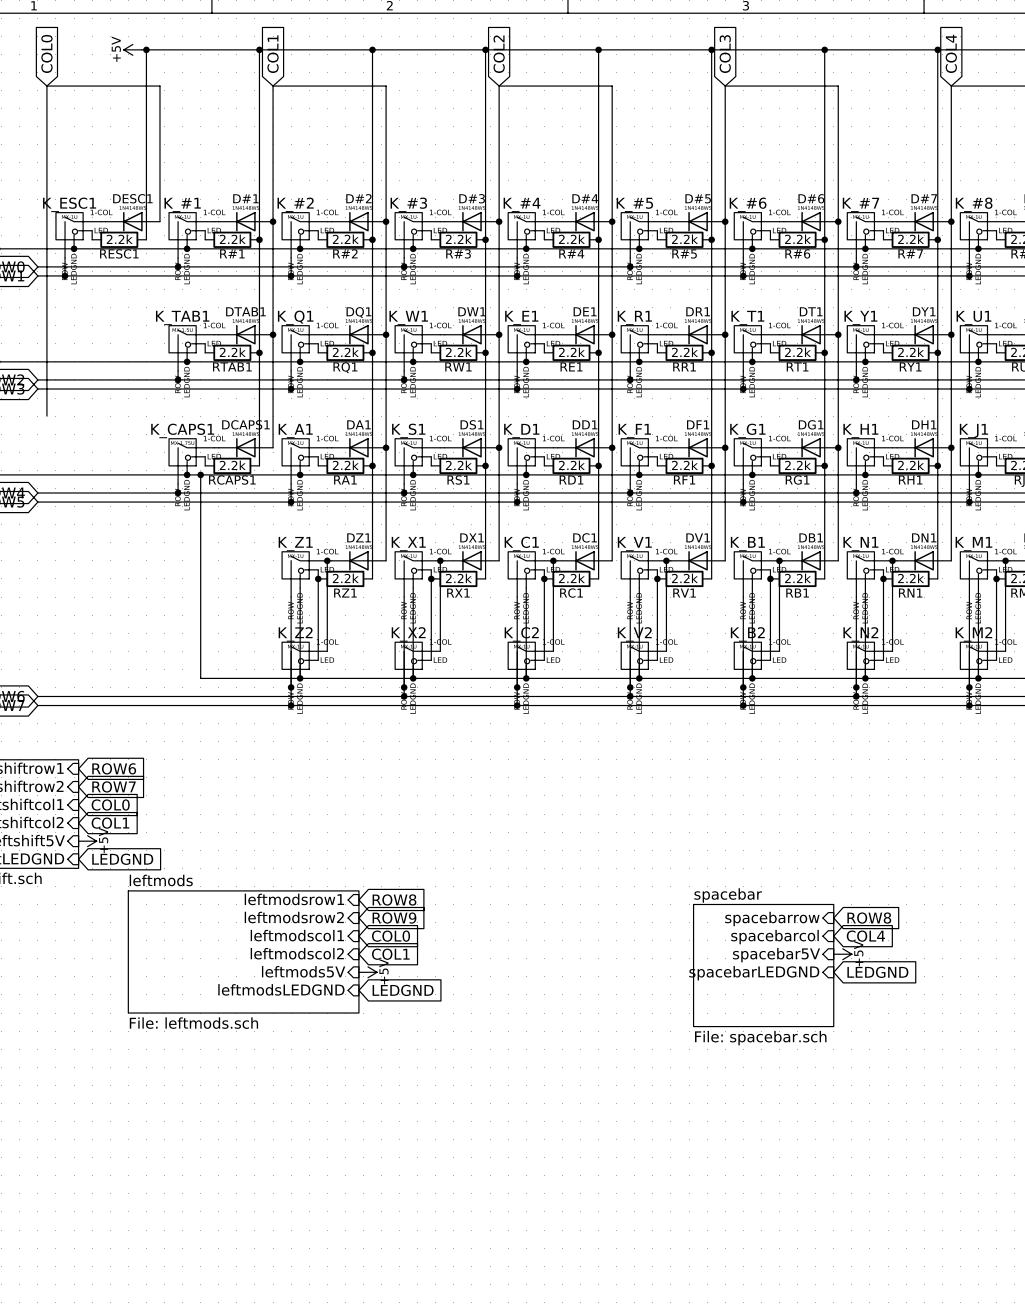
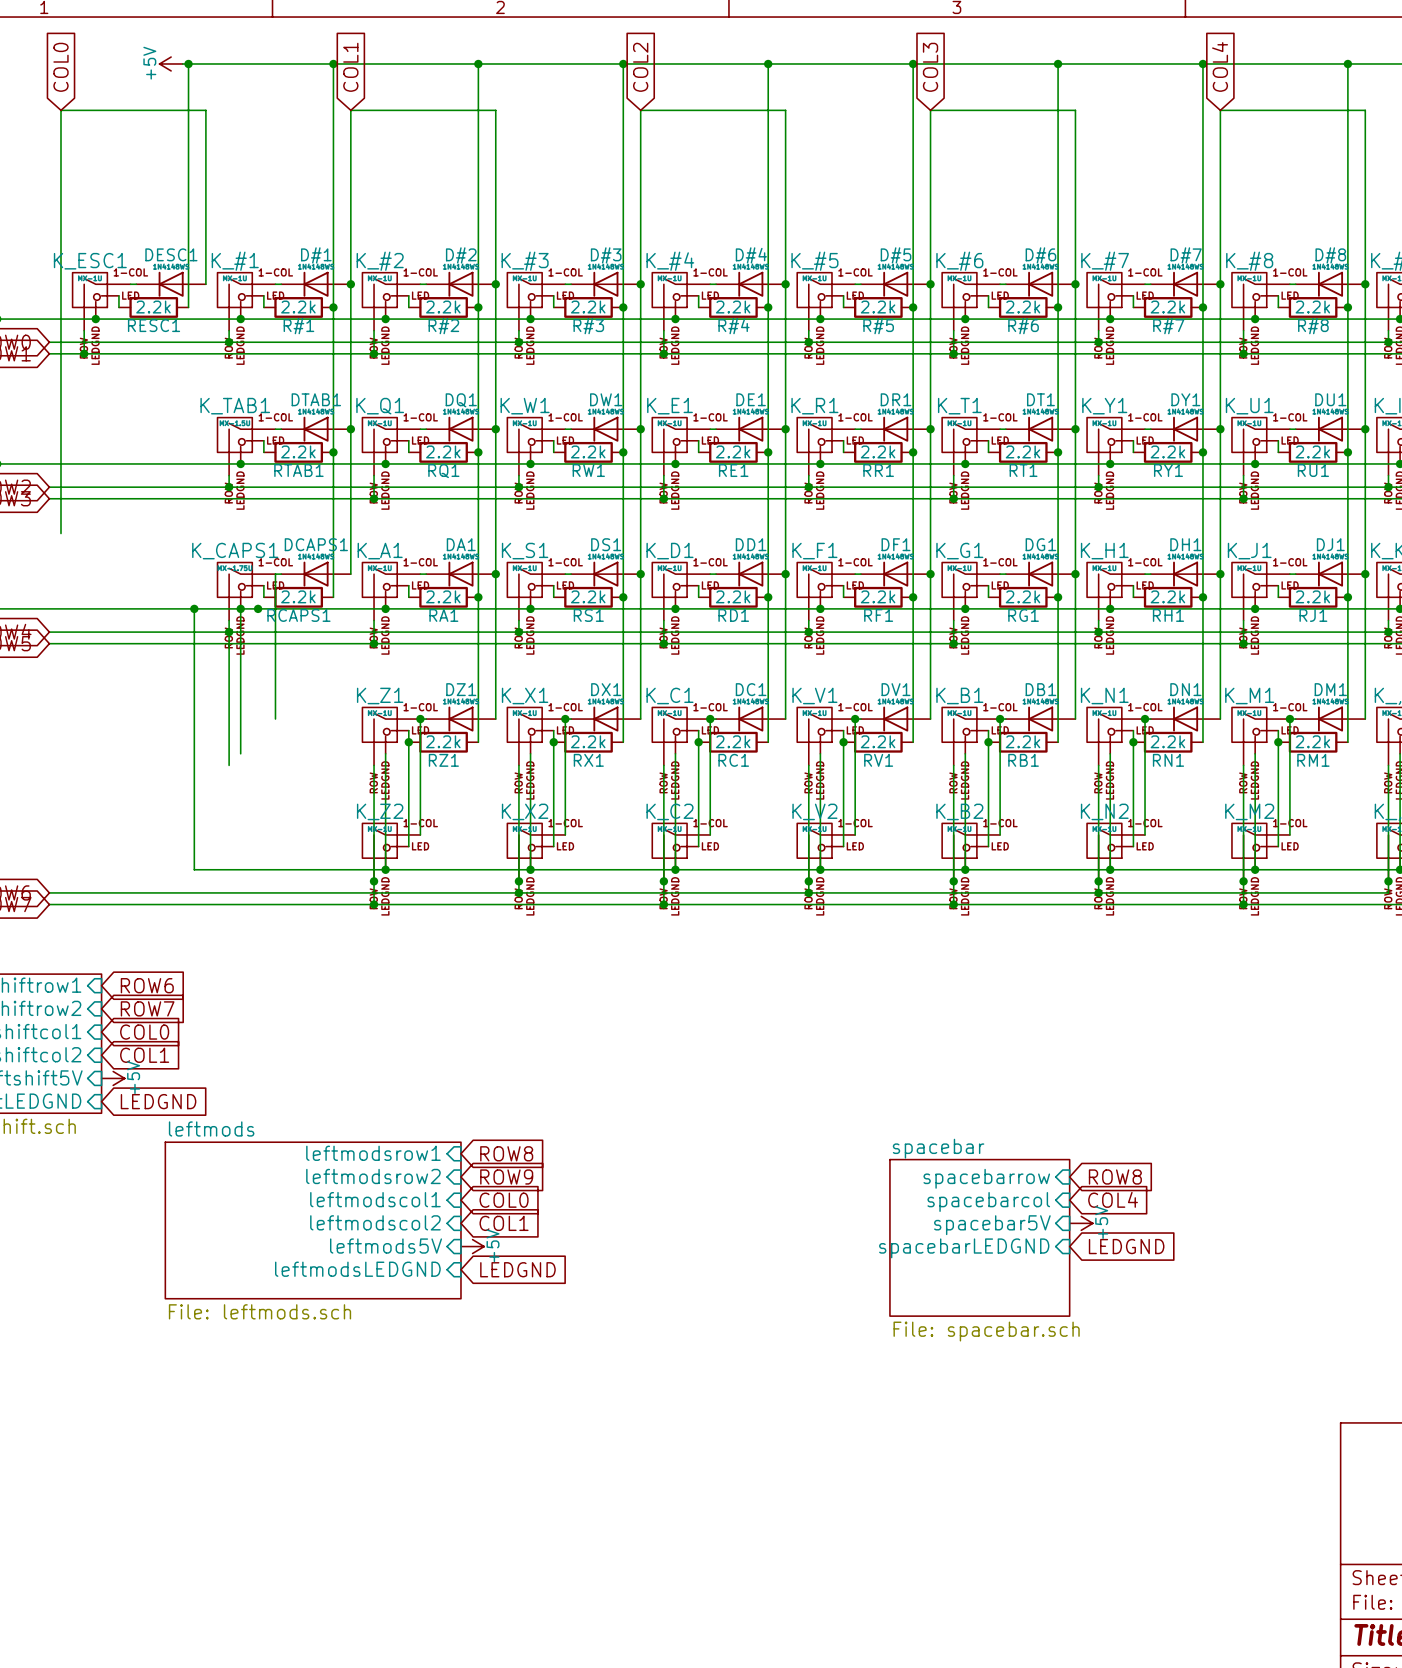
wire: none -> (275, 574) (275, 719)
junction: none -> (194, 608)
wire: none -> (240, 608) (240, 753)
wire: (200, 474) (200, 678) -> (194, 608) (194, 869) (258, 869)
wire: none -> (229, 632) (229, 765)

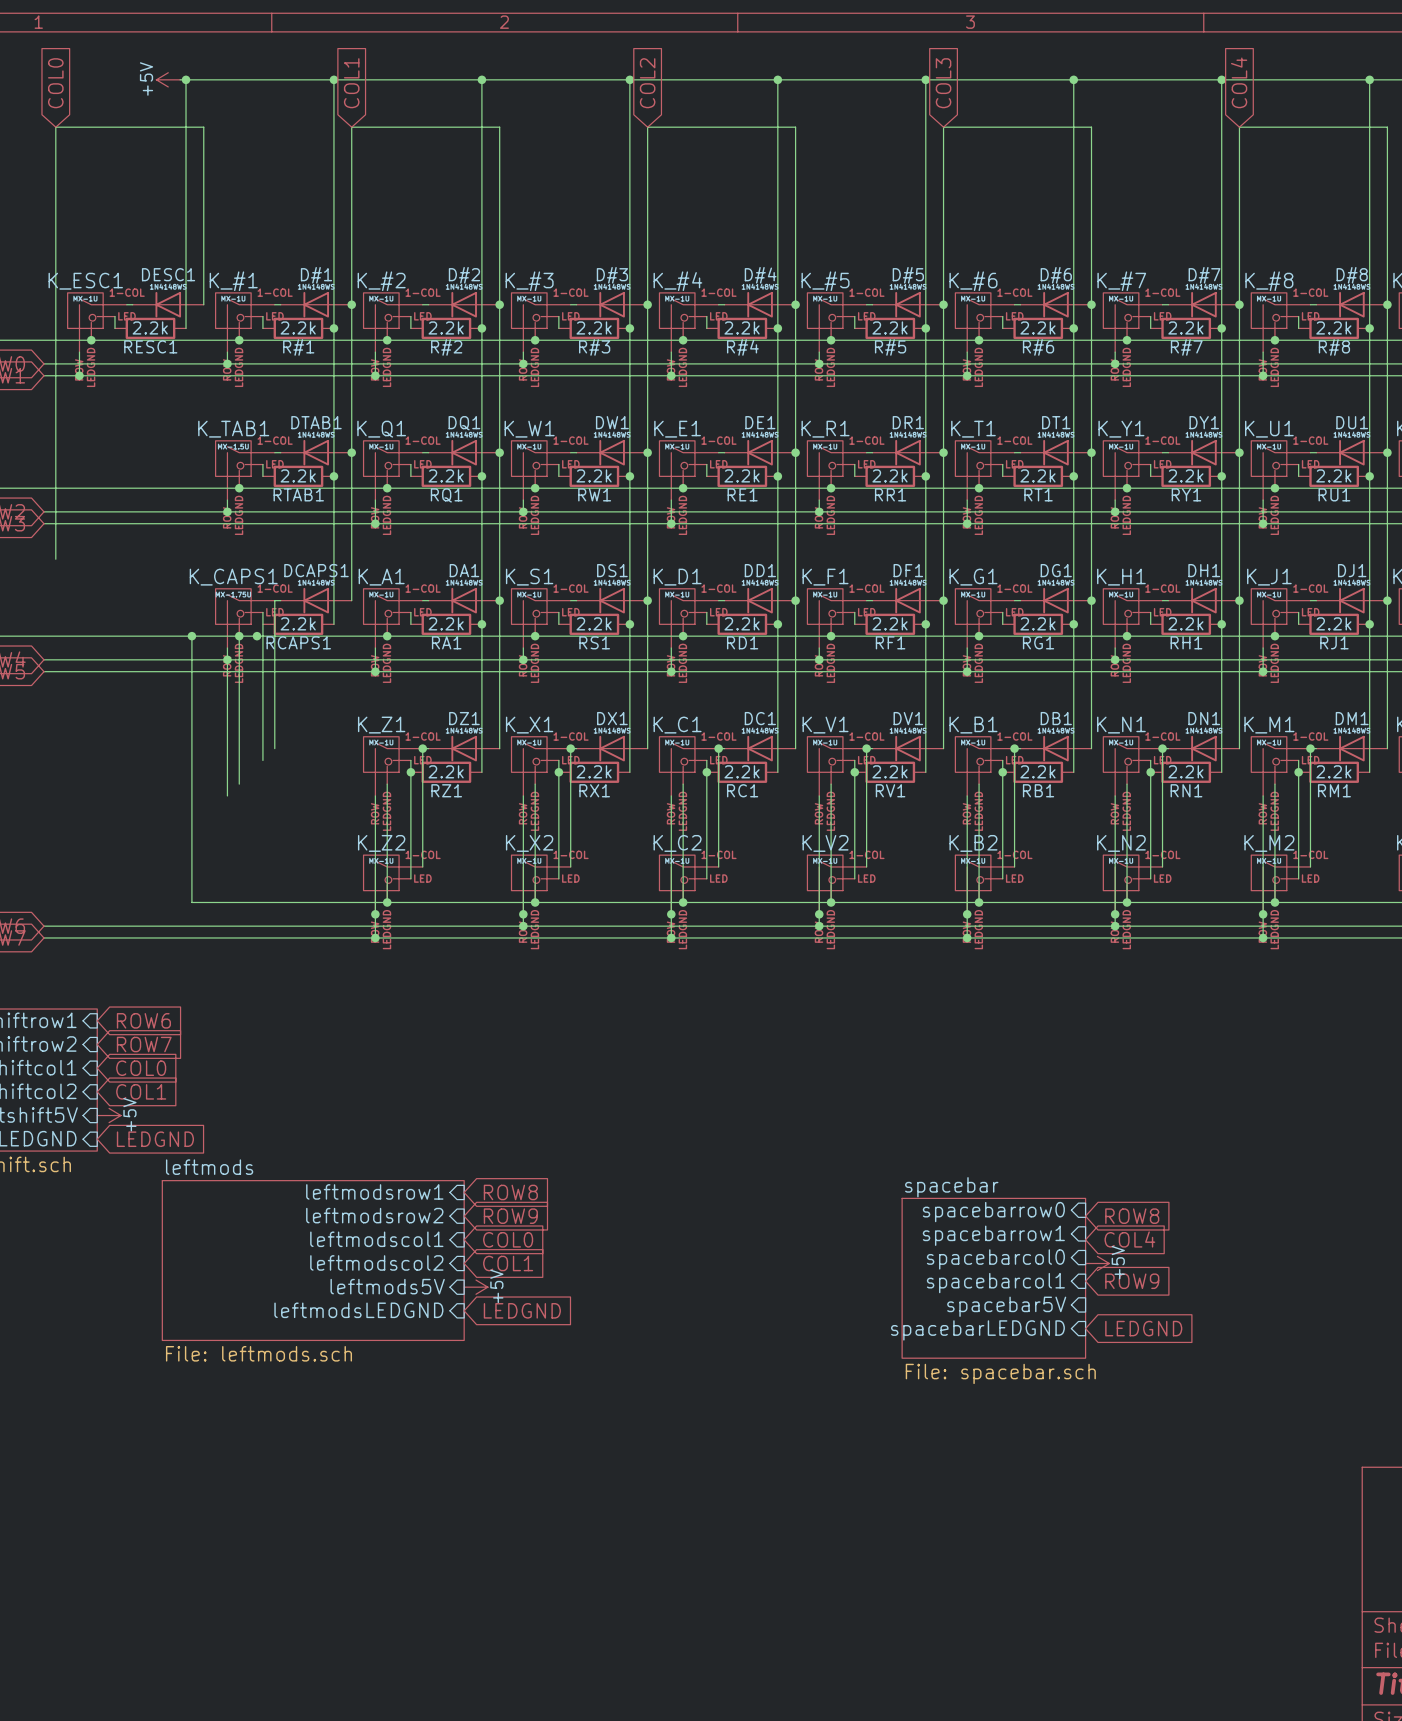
wire: none -> (262, 624) (262, 760)
sheet pin: spacebarrow (986, 1178) -> spacebarrow0 (993, 1212)
sheet pin: spacebarcol (988, 1201) -> spacebarrow1 (993, 1235)
sheet pin: none -> spacebarcol0 (995, 1259)
sheet pin position: spacebar5V (992, 1225) -> spacebar5V (1006, 1306)
global label: none -> ROW9 (1132, 1281)
sheet pin: none -> spacebarcol1 (995, 1283)
global label position: LEDGND (1126, 1246) -> LEDGND (1143, 1328)
sheet pin position: spacebarLEDGND (964, 1248) -> spacebarLEDGND (977, 1330)

